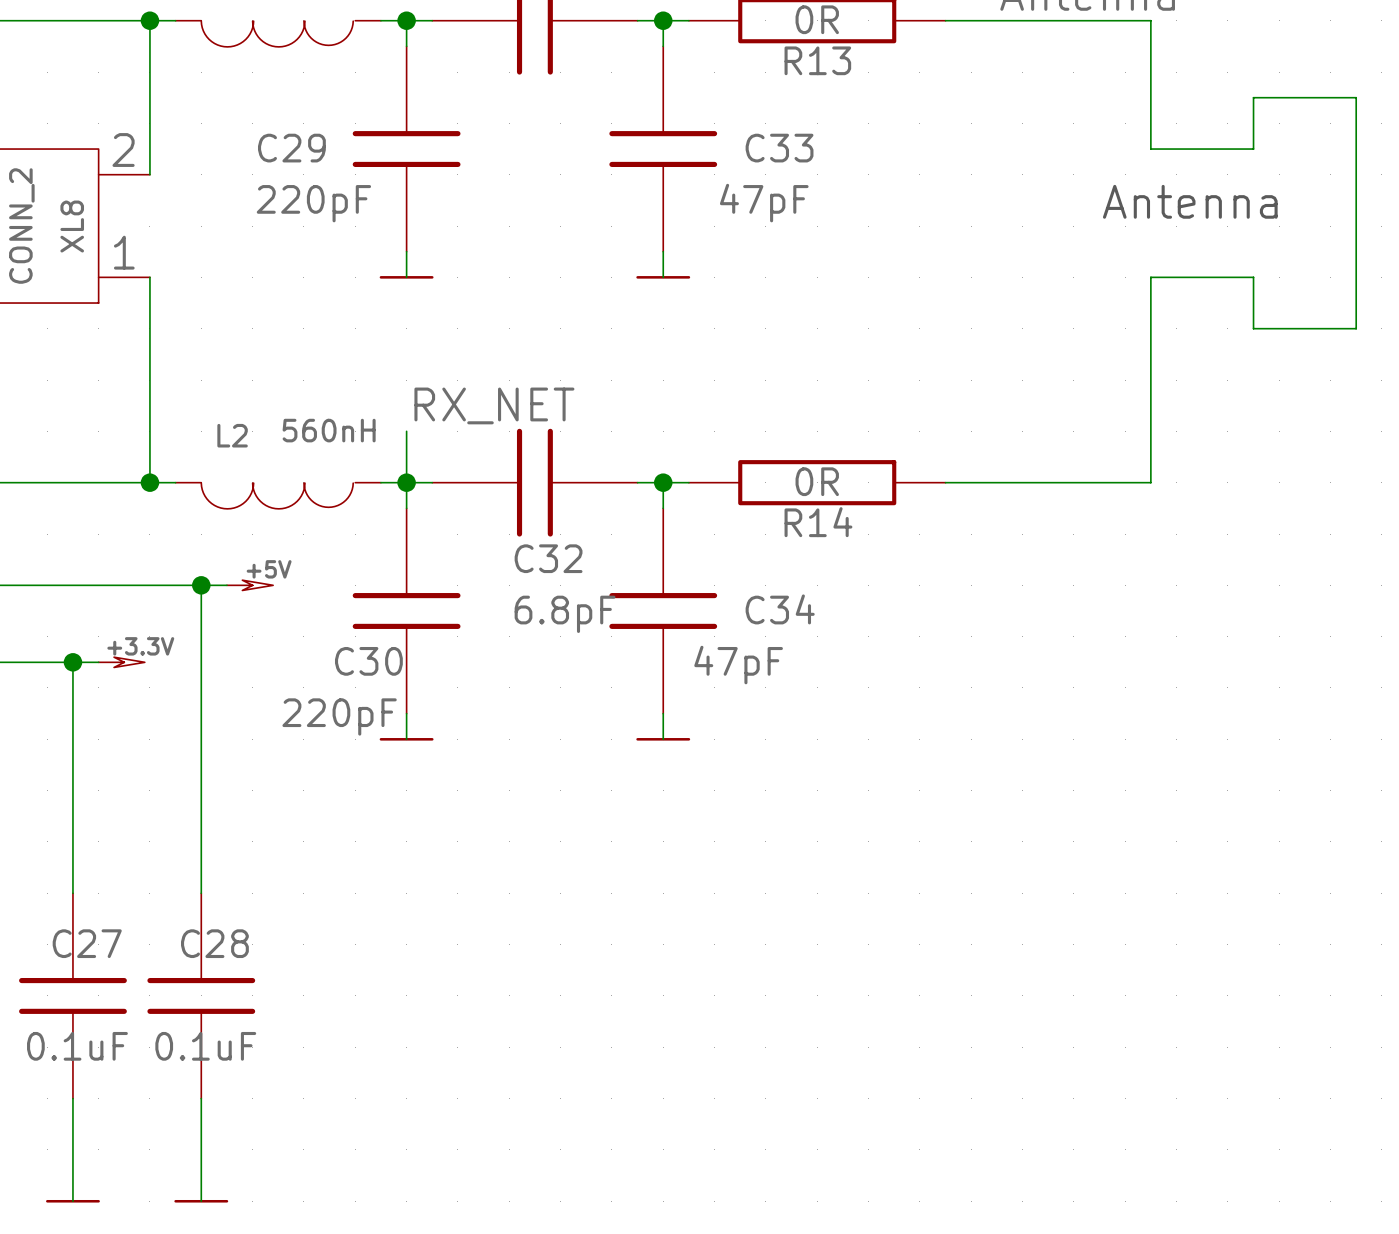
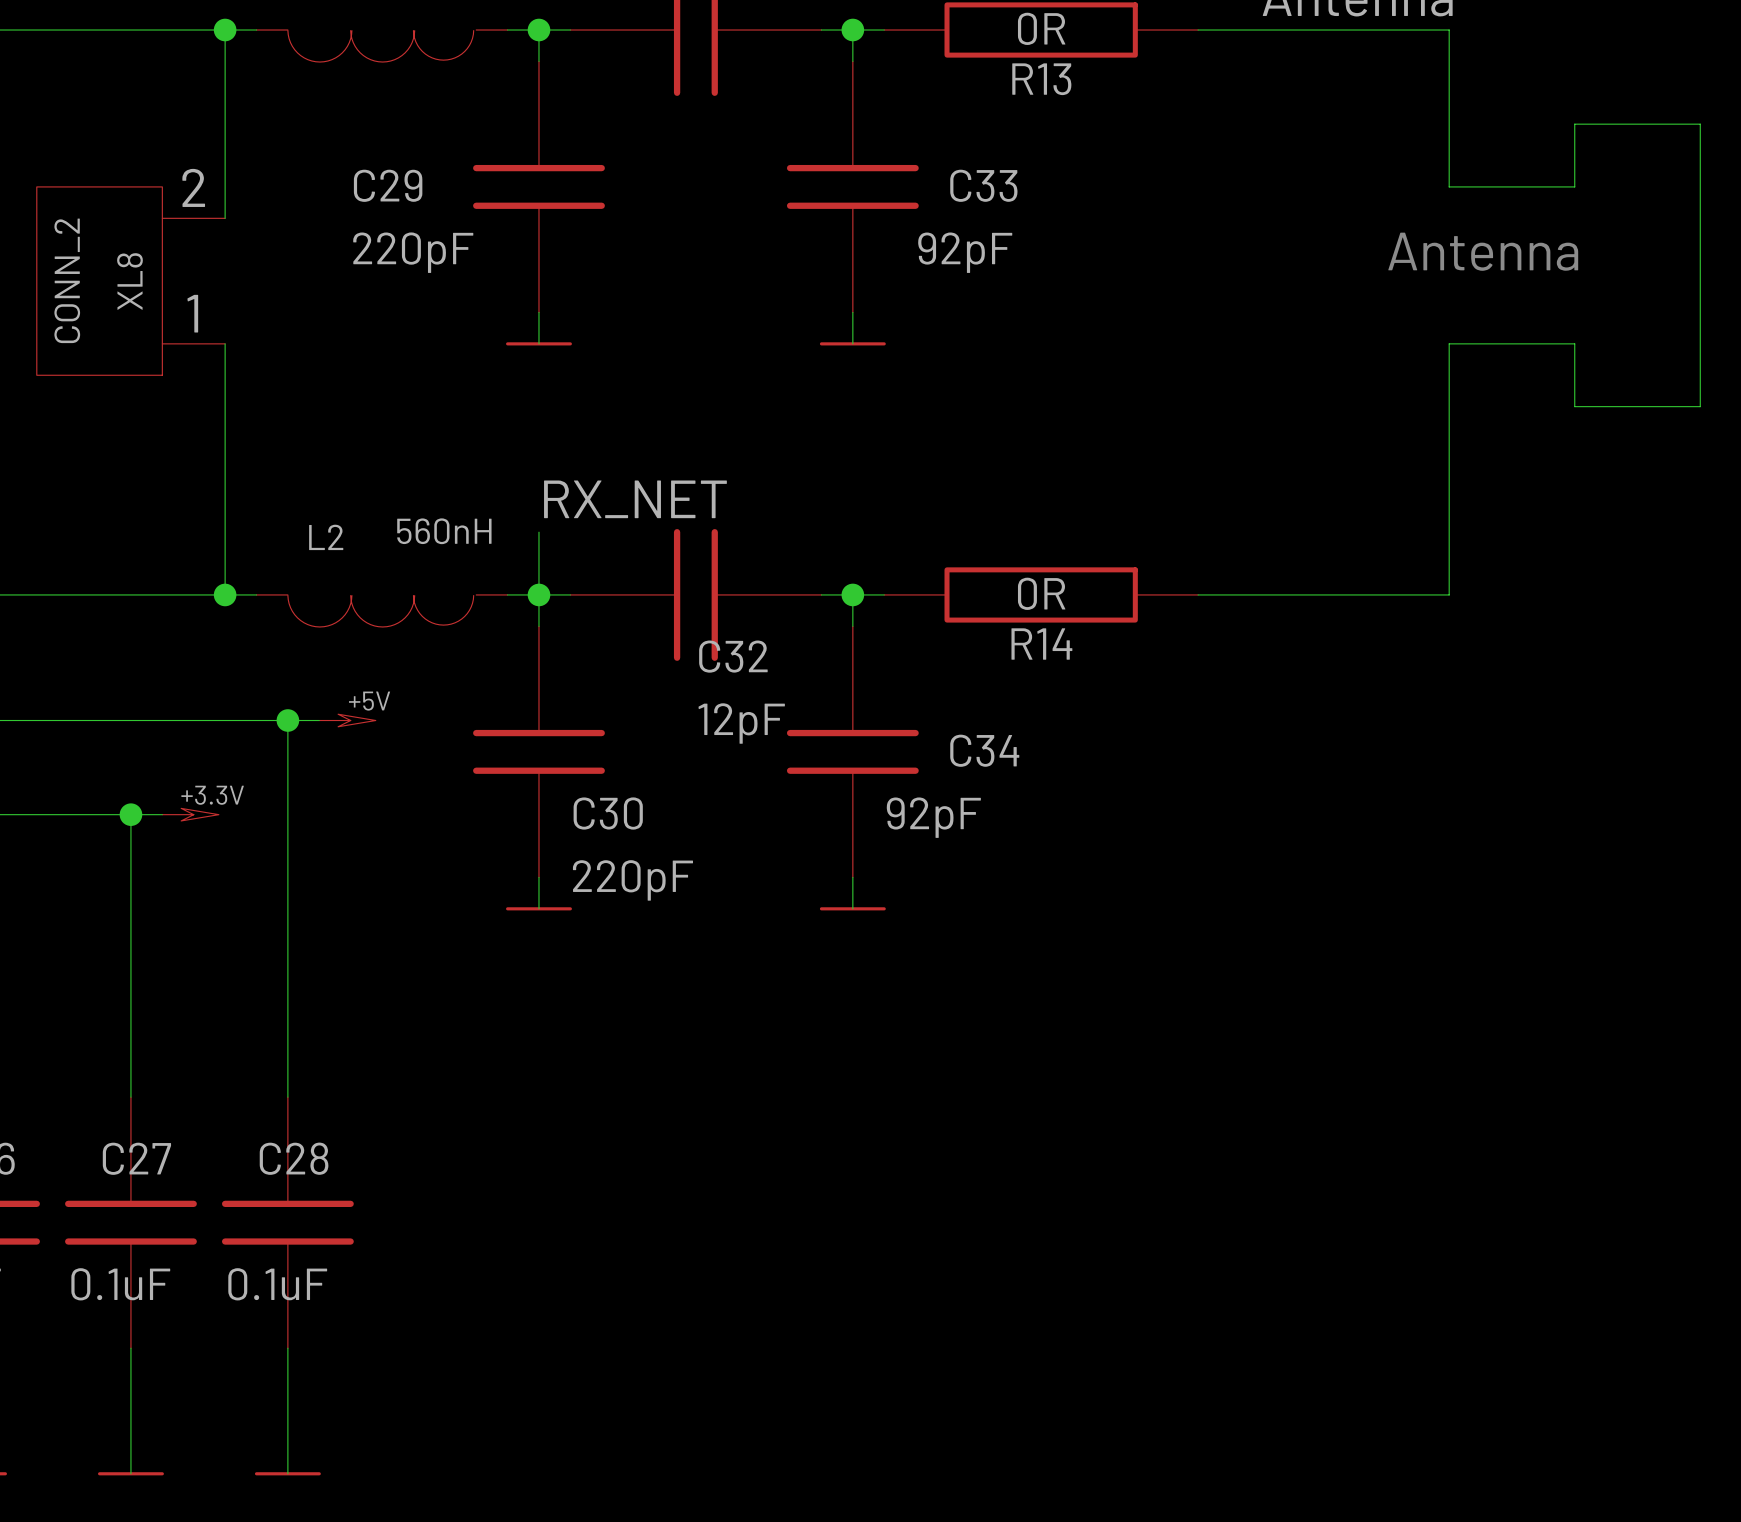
C33 value: 47pF (764, 203) -> 92pF (965, 252)
C32 name position: C32 (548, 558) -> C32 (733, 656)
C32 value: 6.8pF (565, 614) -> 12pF (741, 723)
C30 name position: C30 (368, 661) -> C30 (608, 813)
C34 value: 47pF (738, 665) -> 92pF (933, 817)
C30 value position: 220pF (339, 716) -> 220pF (632, 880)

